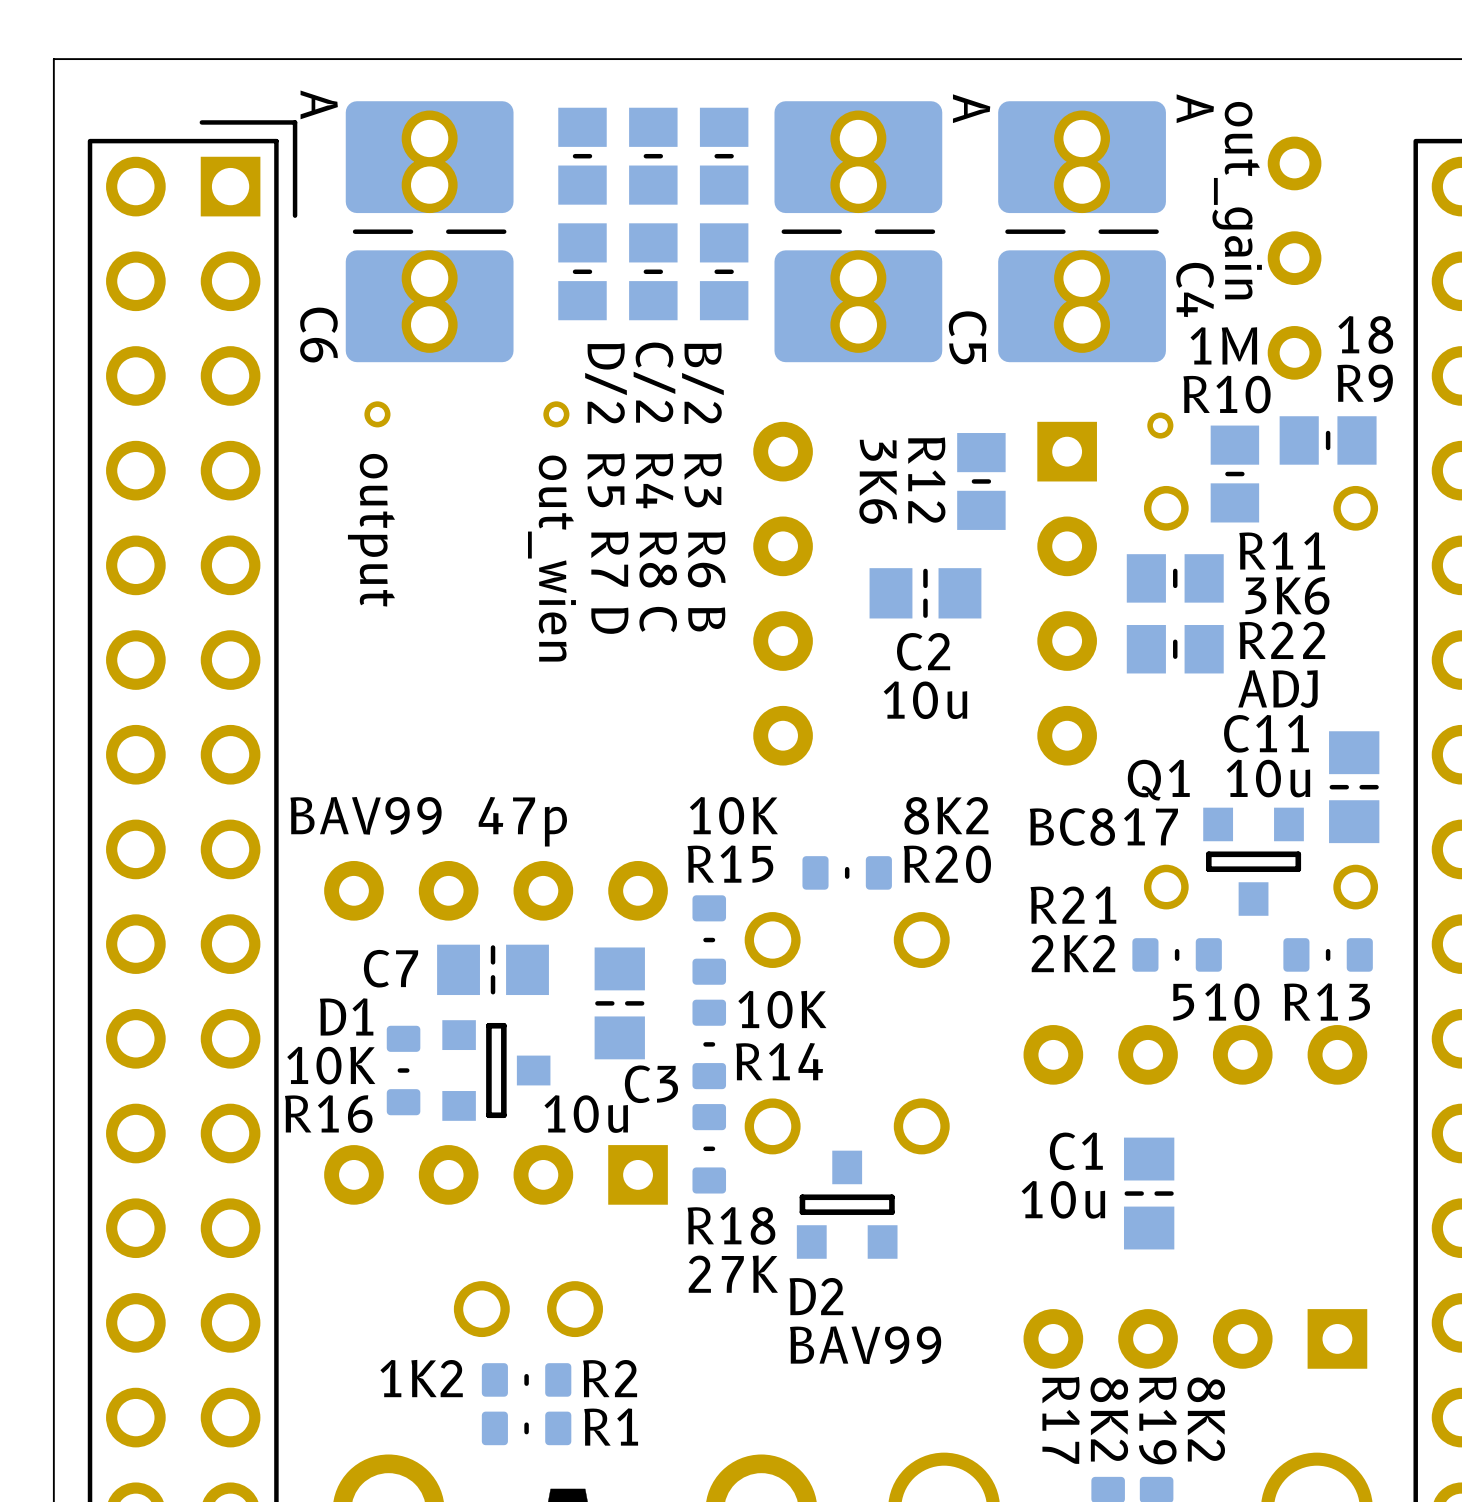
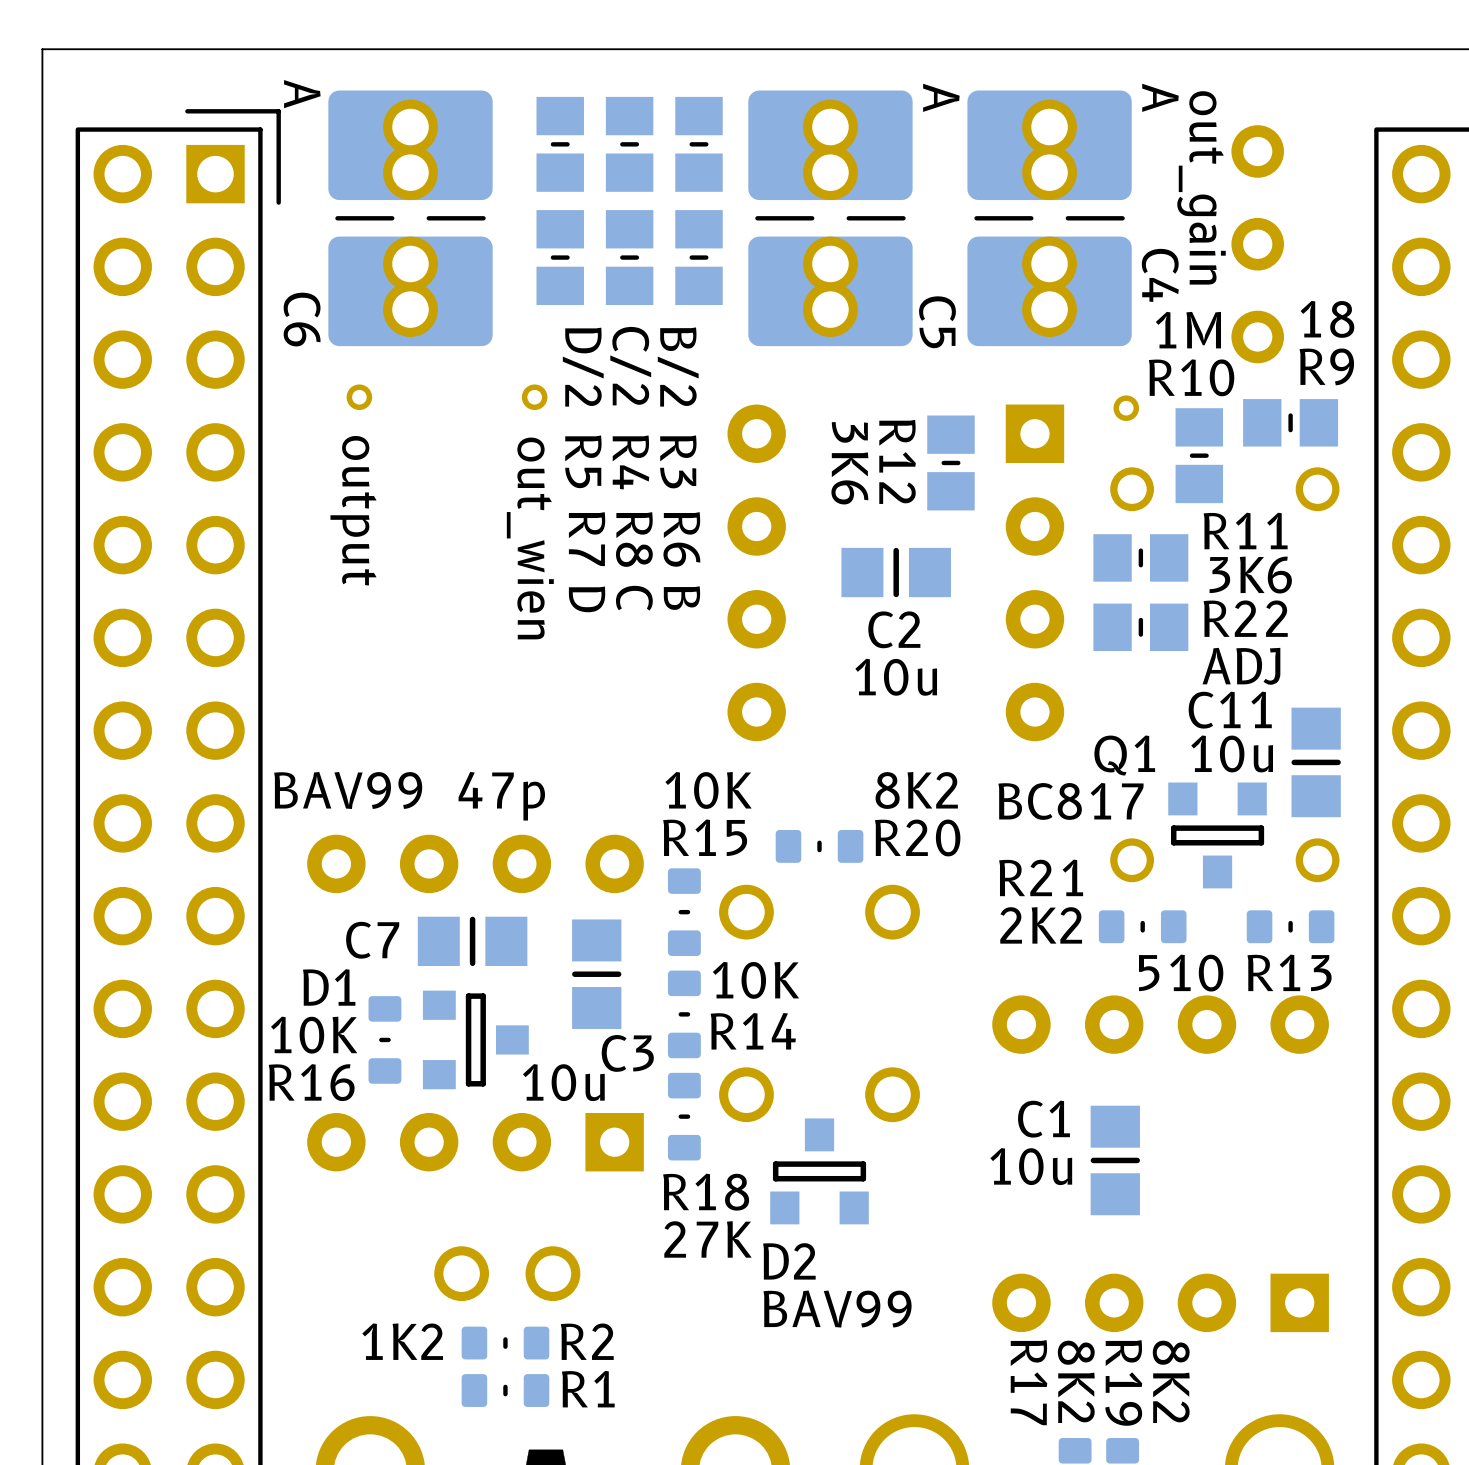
C2 footprint: [869, 568, 982, 619] -> [841, 547, 951, 598]
C11 footprint: [1329, 731, 1380, 844] -> [1291, 707, 1341, 818]
C7 footprint: [437, 944, 549, 996] -> [417, 916, 528, 967]
C3 footprint: [594, 947, 645, 1060] -> [572, 919, 622, 1030]
C1 footprint: [1123, 1137, 1175, 1250] -> [1090, 1105, 1140, 1216]

